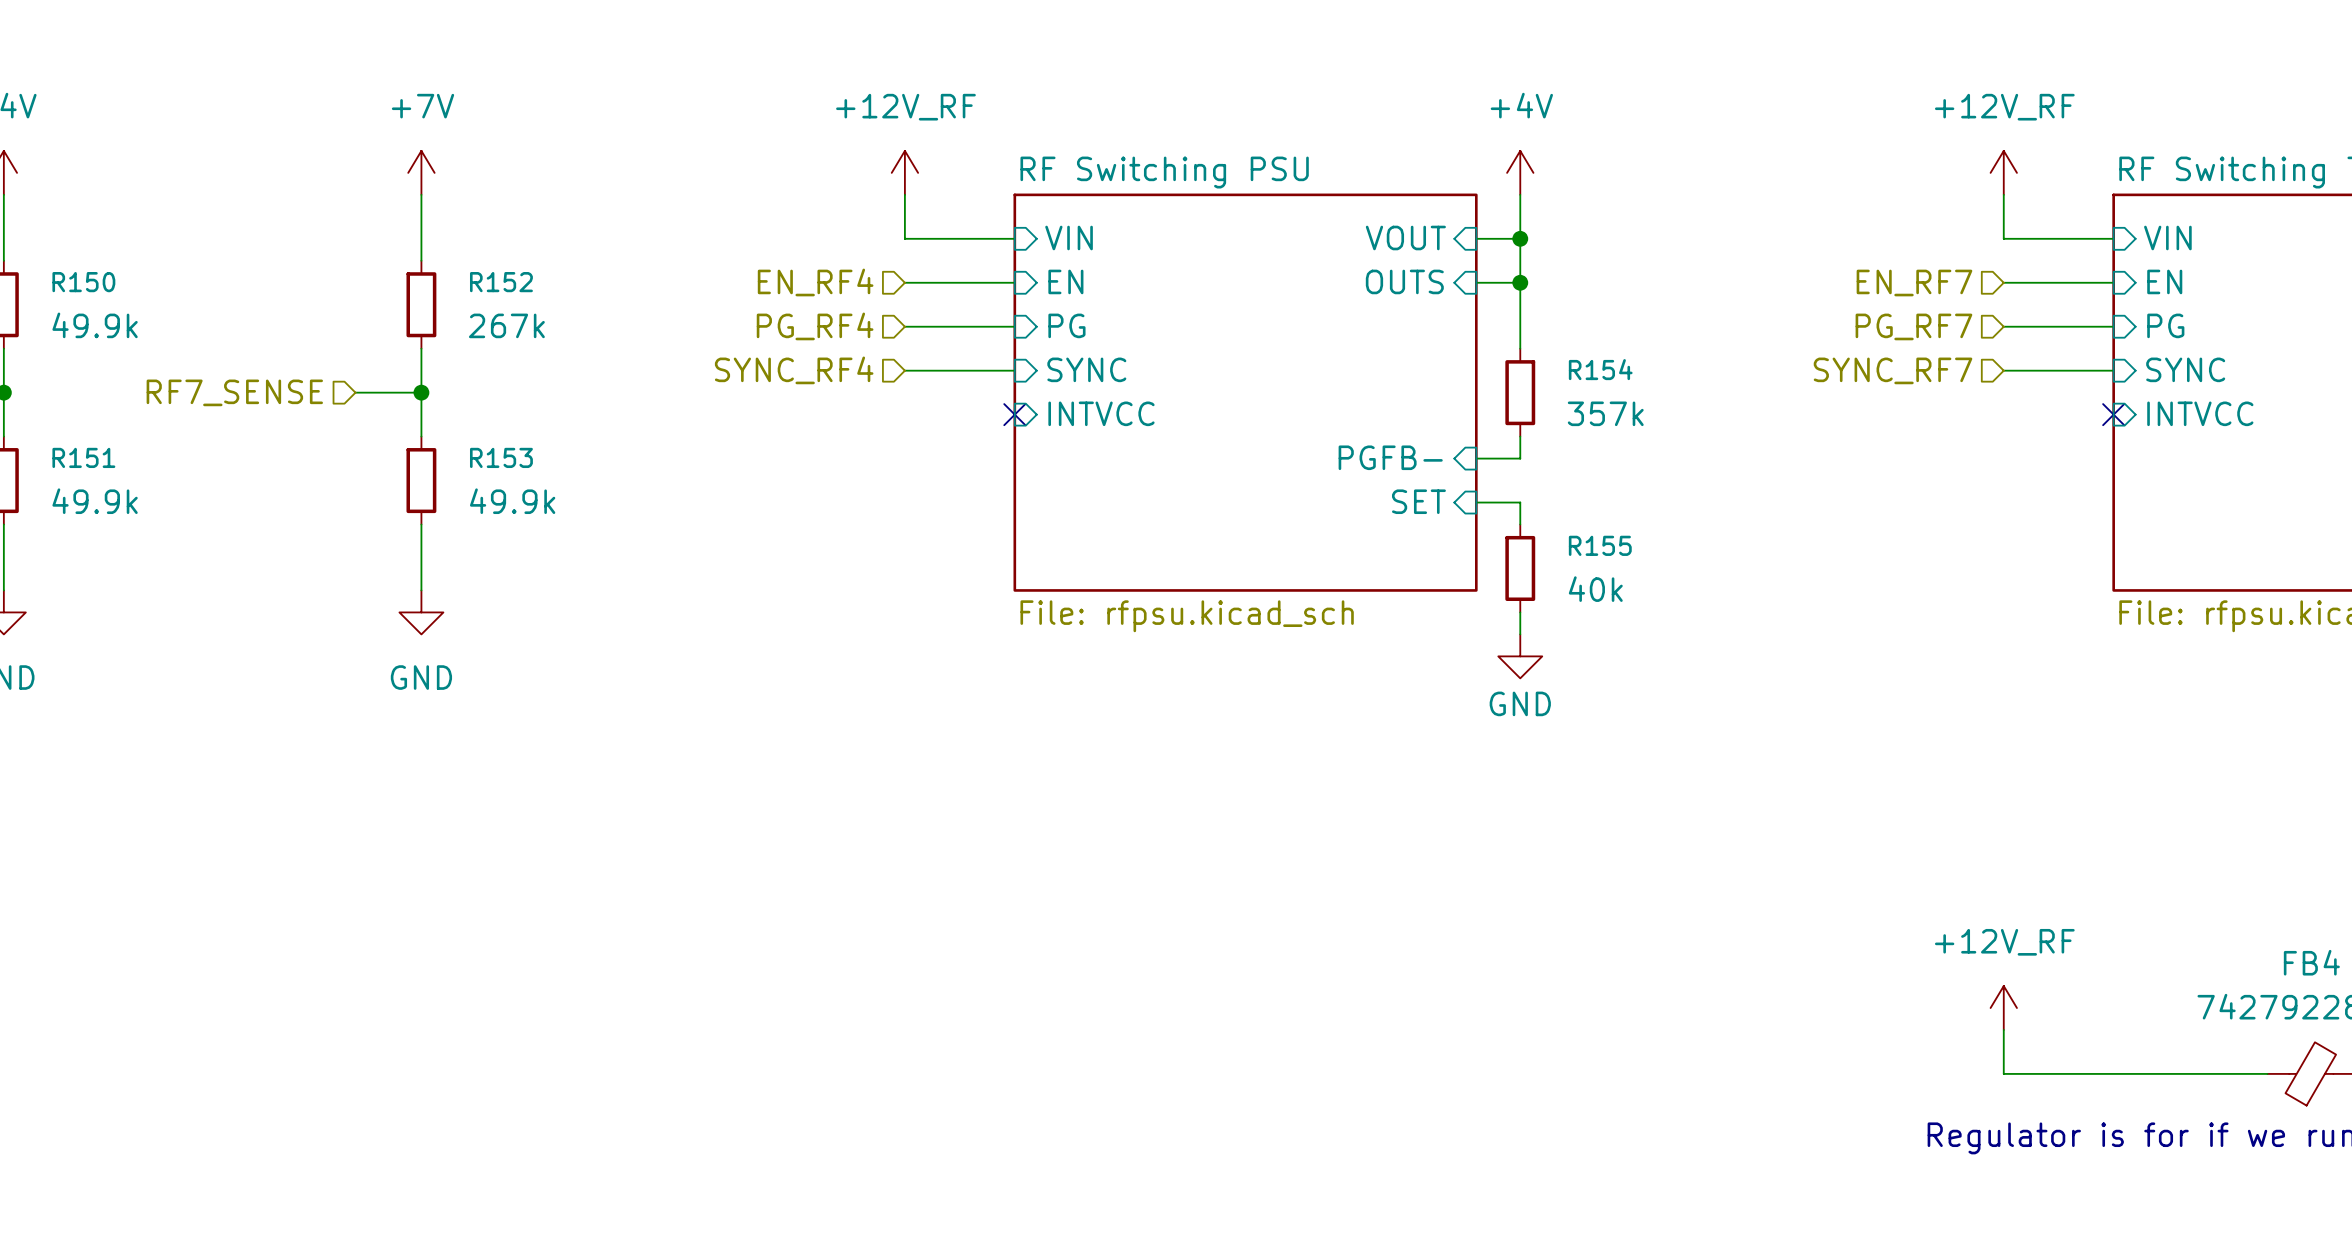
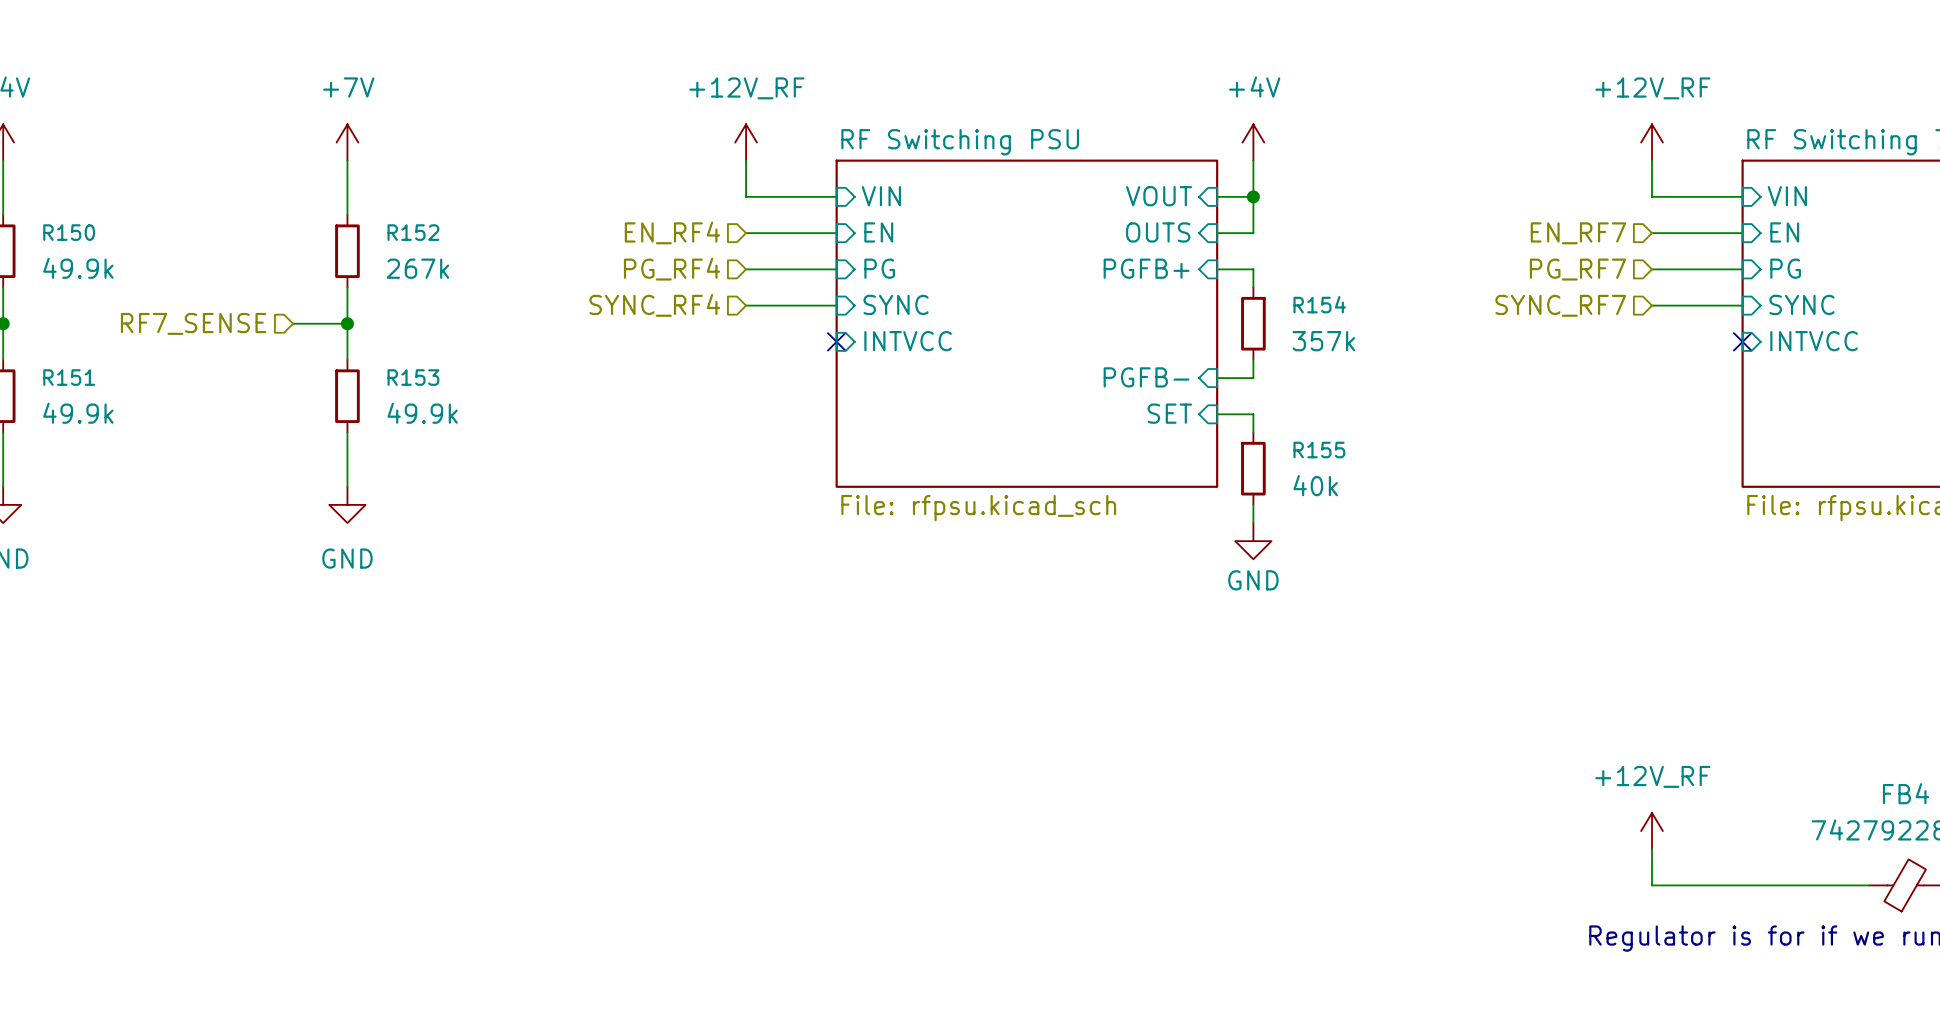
wire: (1520, 282) (1520, 326) -> (1217, 269) (1253, 269)
junction: (1520, 282) -> none
sheet pin: none -> PGFB+ (1146, 268)

